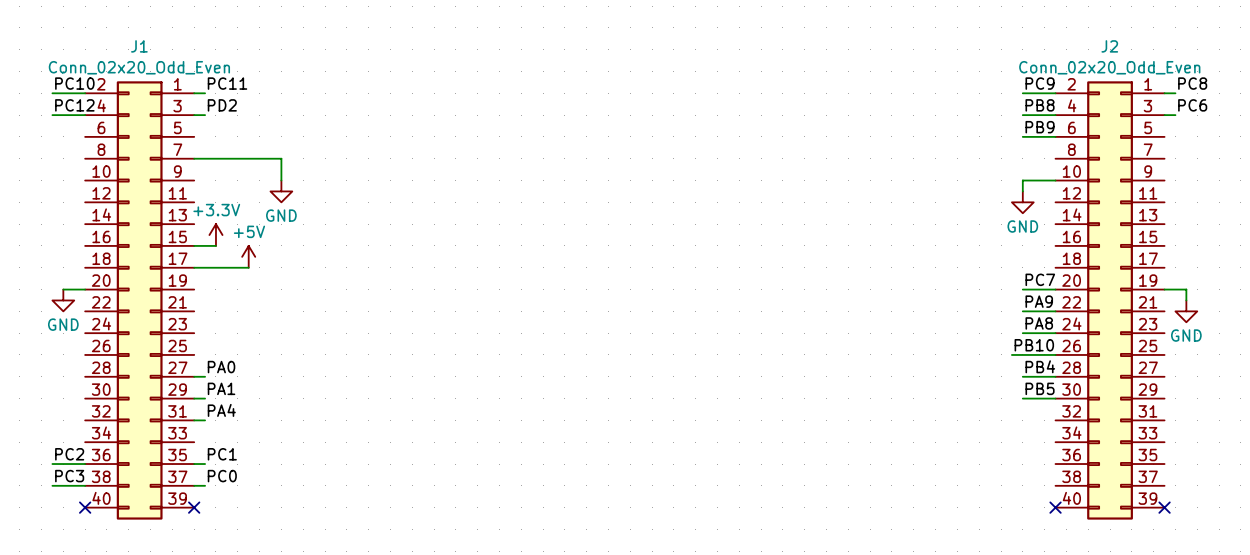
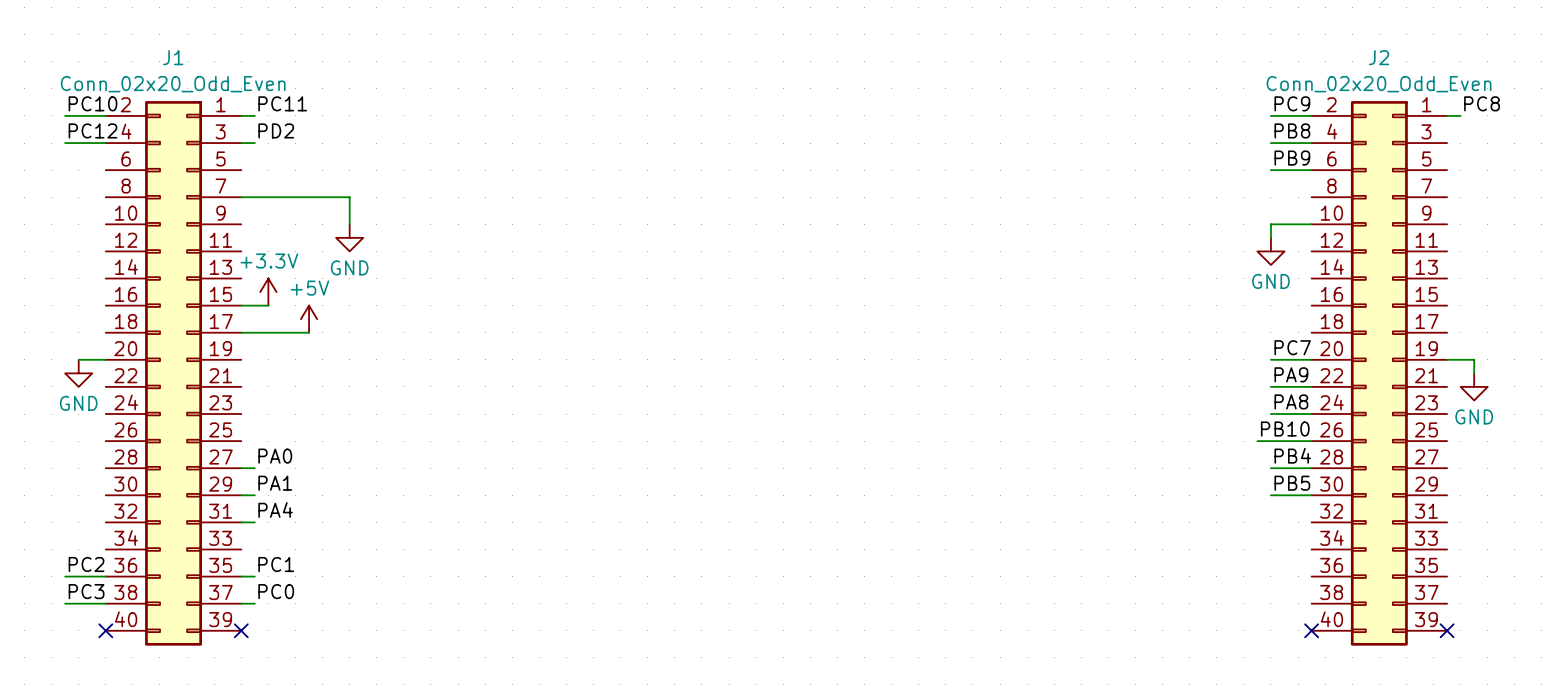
label: PC6 (1192, 105) -> none
wire: (1164, 115) (1175, 115) -> none

